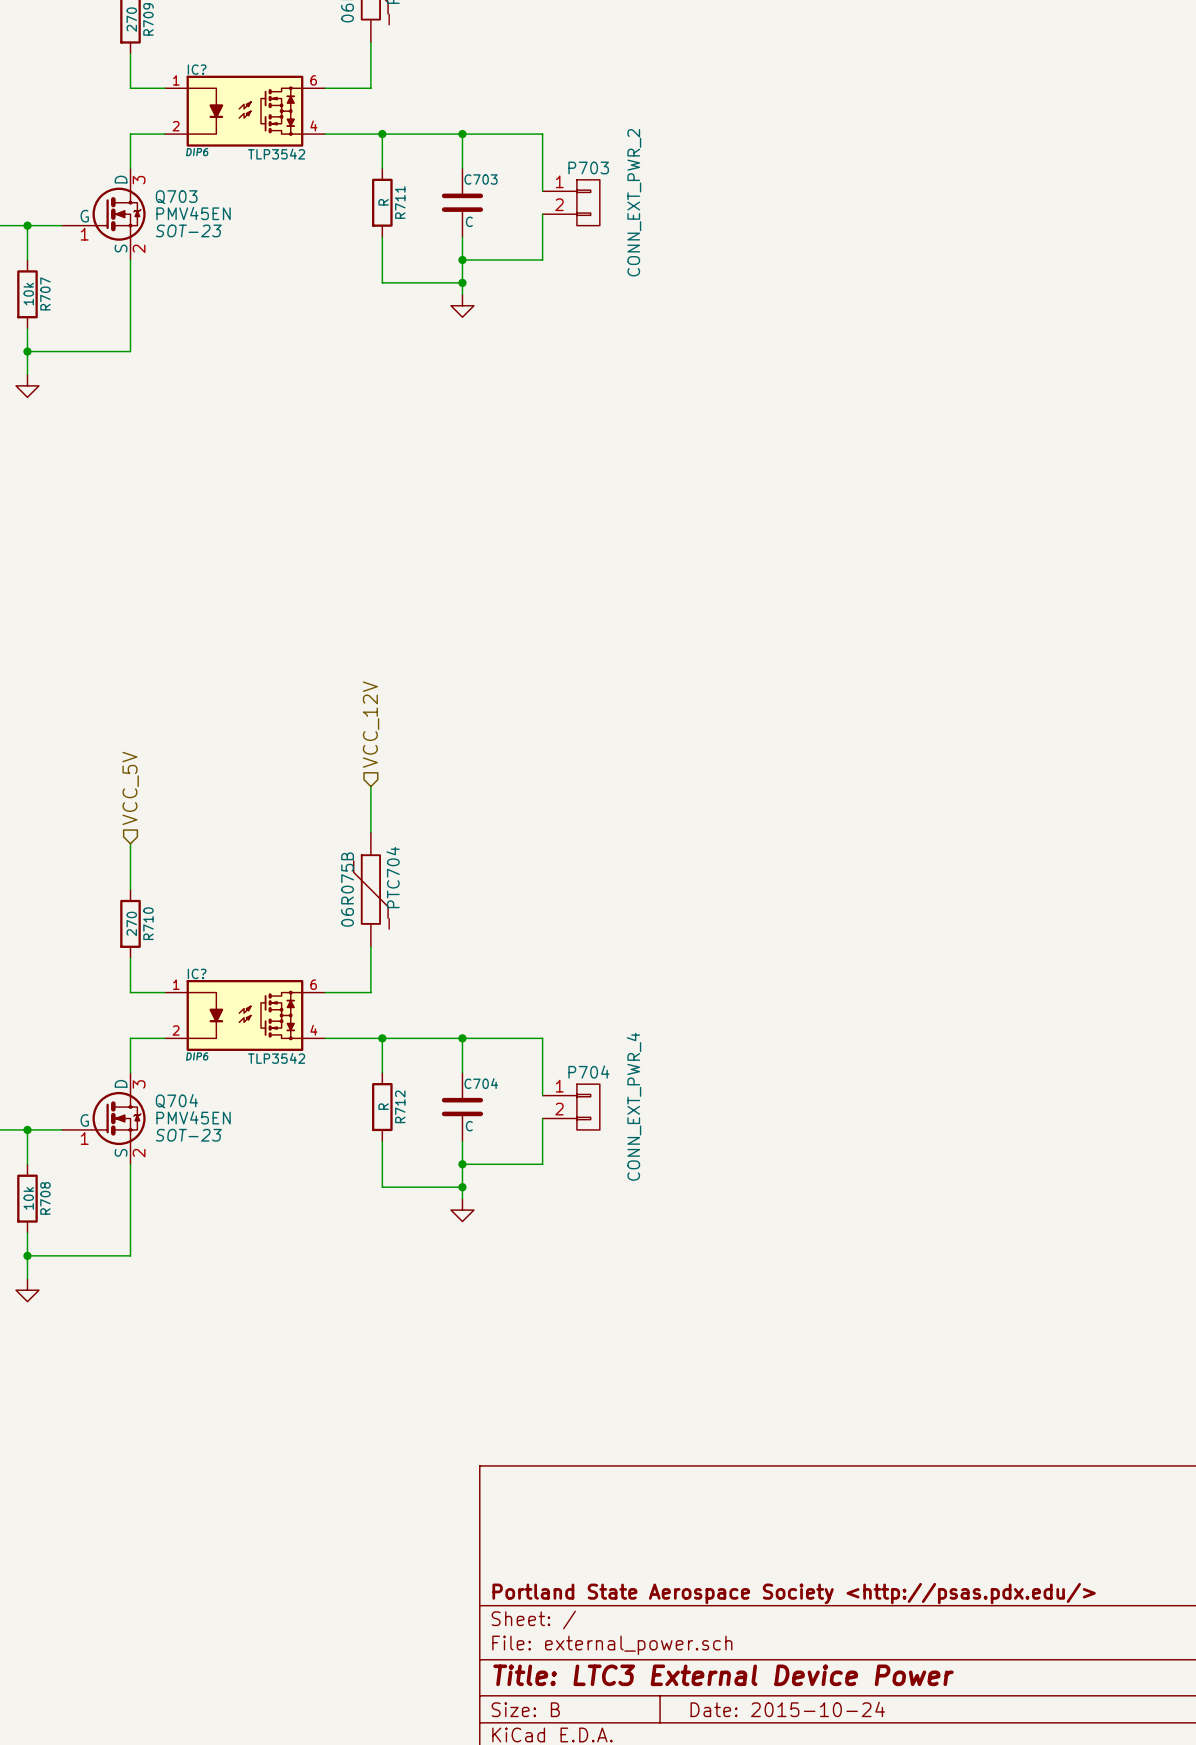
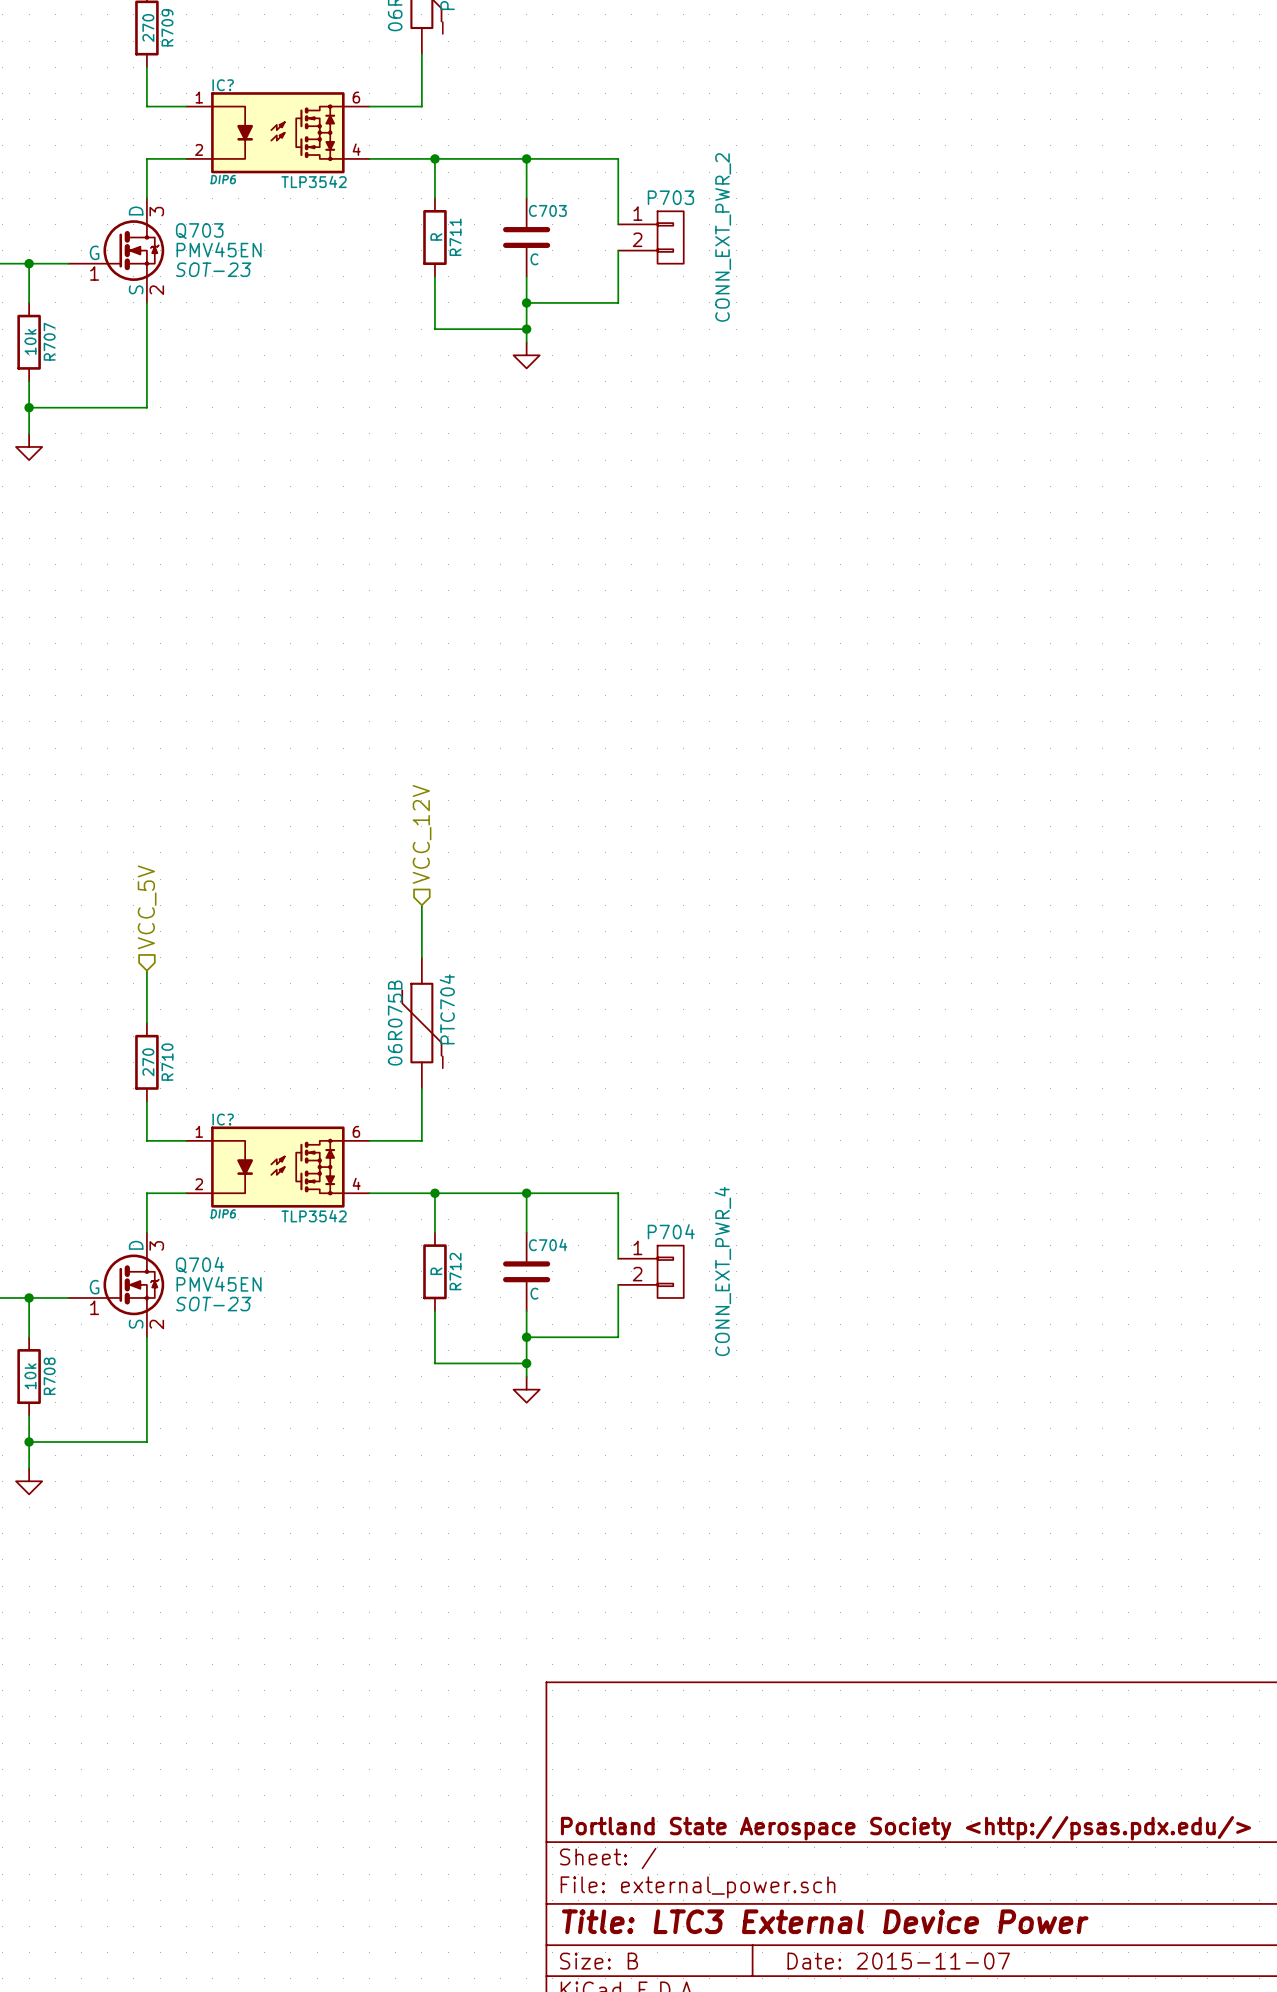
title block: Date: 2015-10-24 (787, 1709) -> Date: 2015-11-07 (898, 1961)

